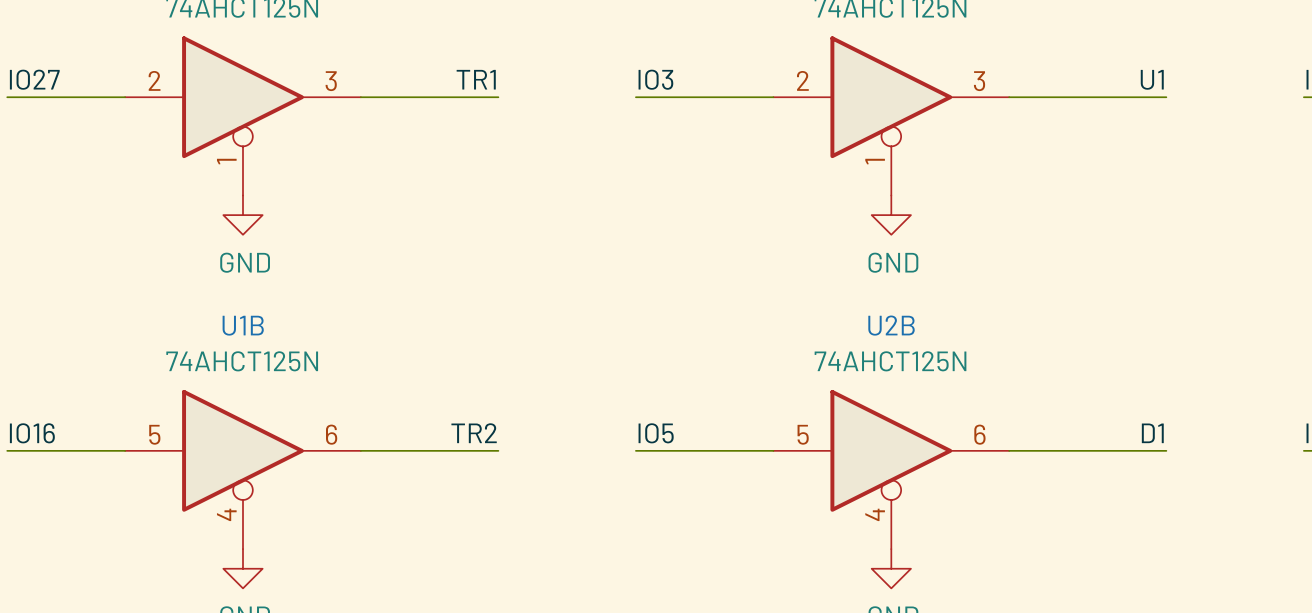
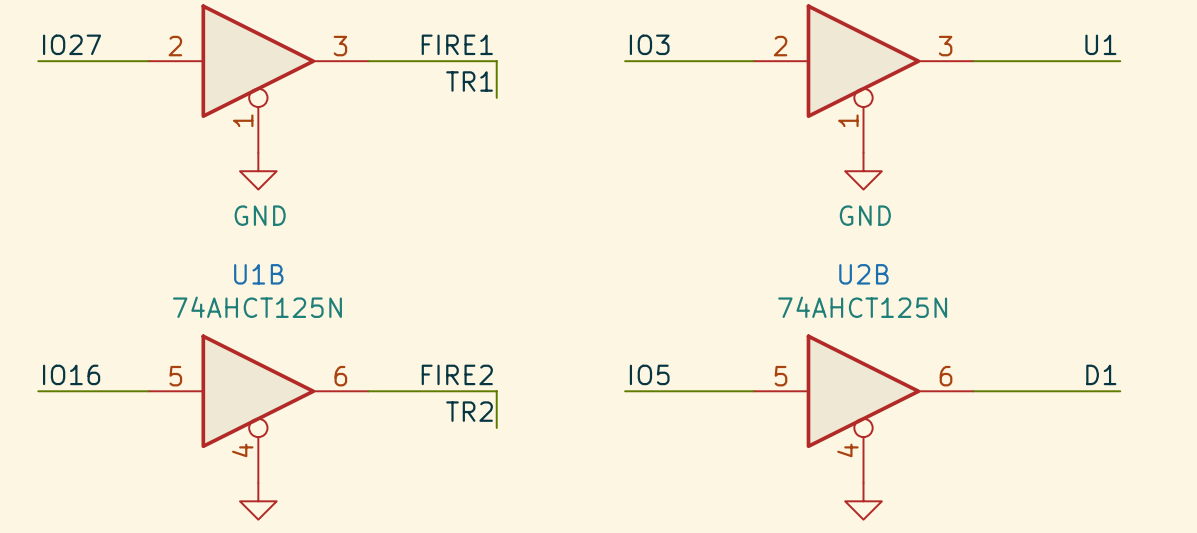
label: TR1 (476, 79) -> FIRE1 (457, 44)
wire: none -> (496, 61) (496, 97)
label: none -> TR1 (469, 81)
label: TR2 (474, 433) -> FIRE2 (457, 374)
wire: none -> (496, 391) (496, 427)
label: none -> TR2 (469, 411)

